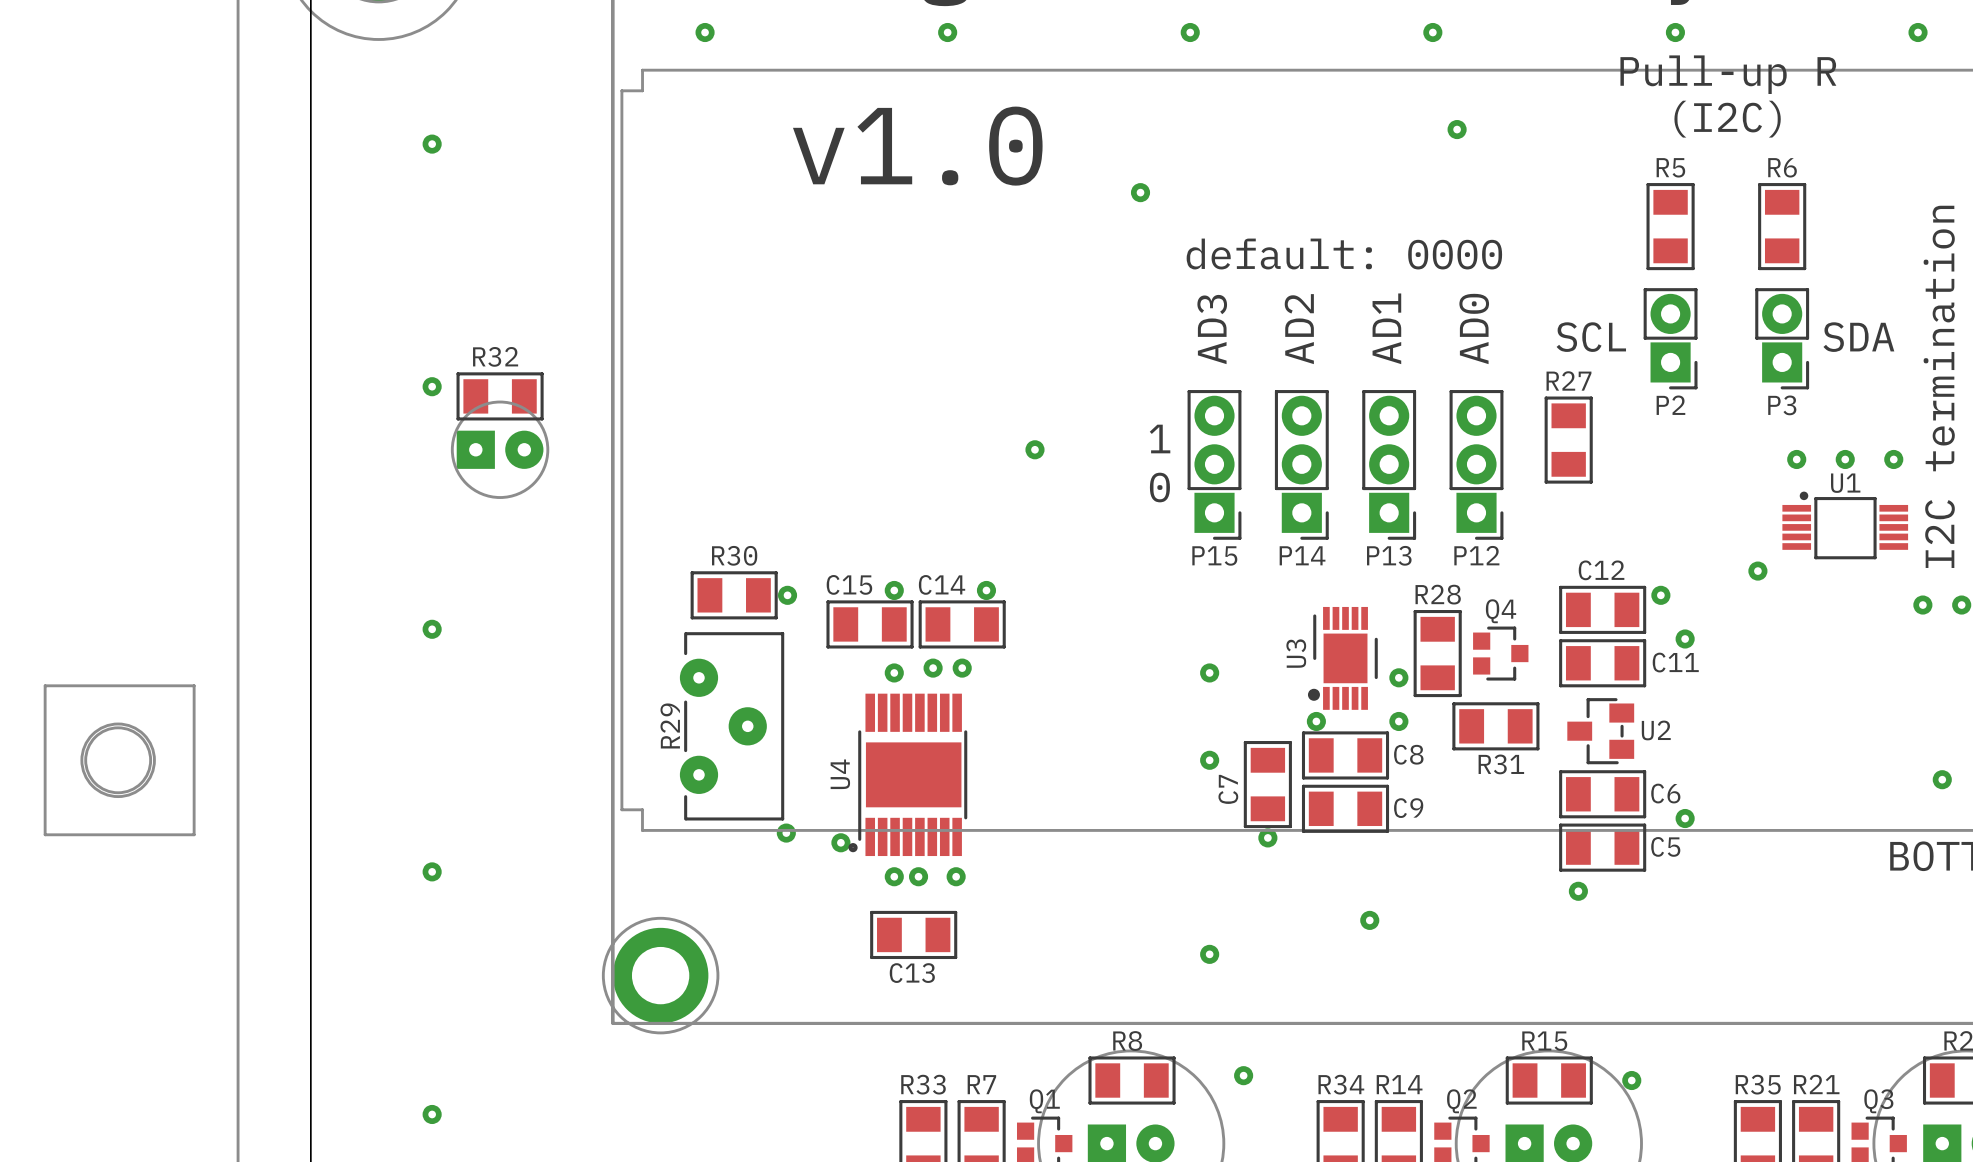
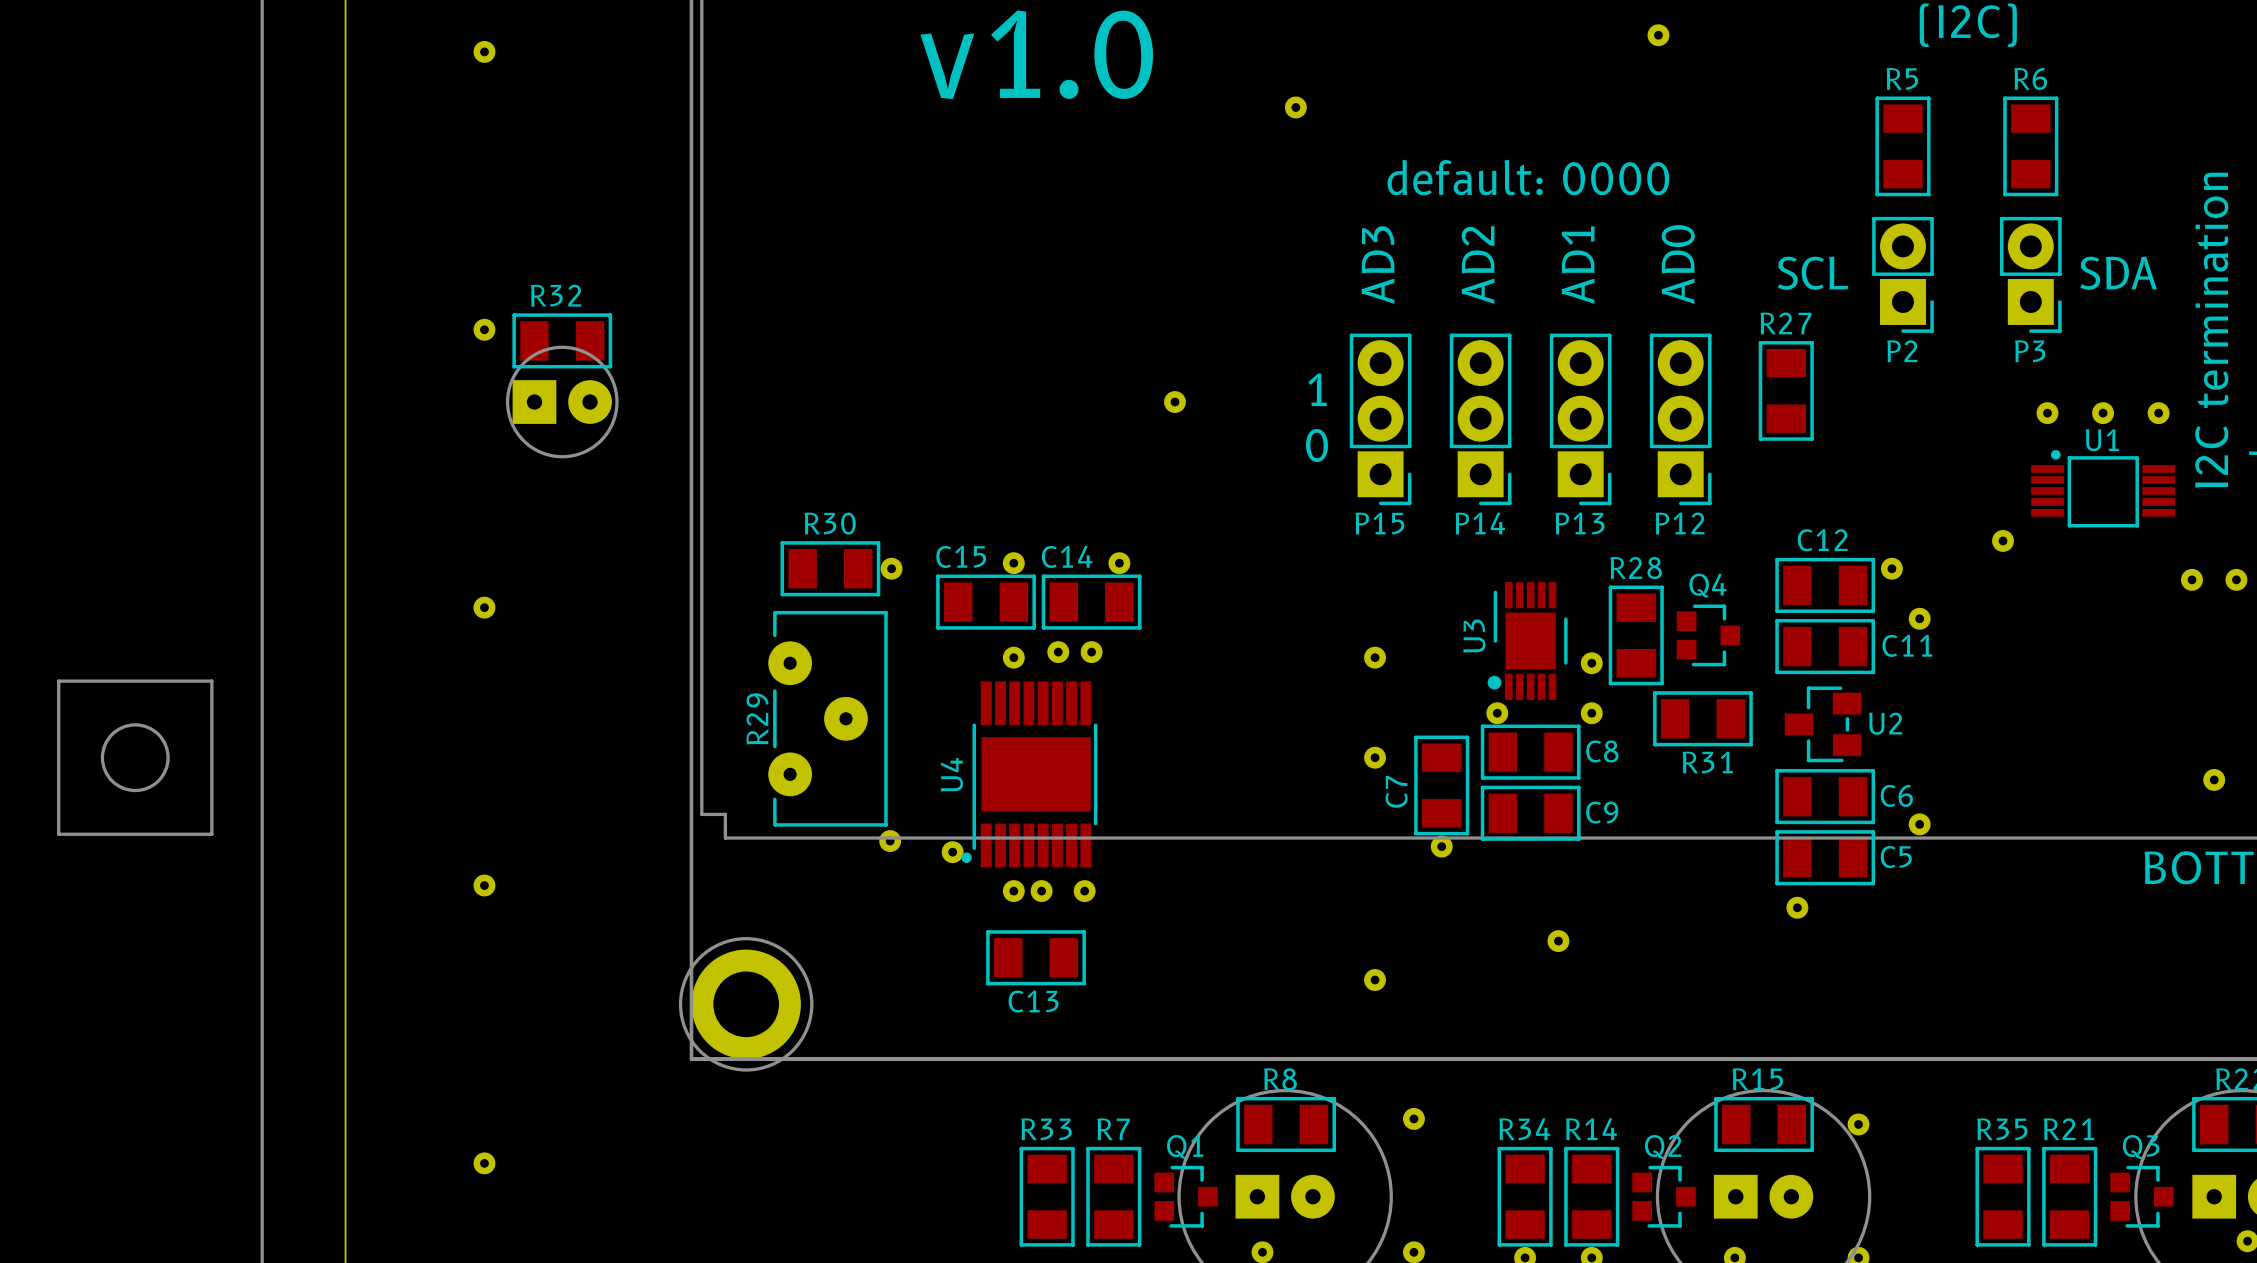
line: (194, 693) (194, 685) (45, 685) (45, 834) (194, 834) (194, 827) -> (211, 681) (58, 681) (58, 834) (211, 834)
drawing: [80, 722, 156, 799] -> none
drawing: none -> [100, 723, 170, 793]

